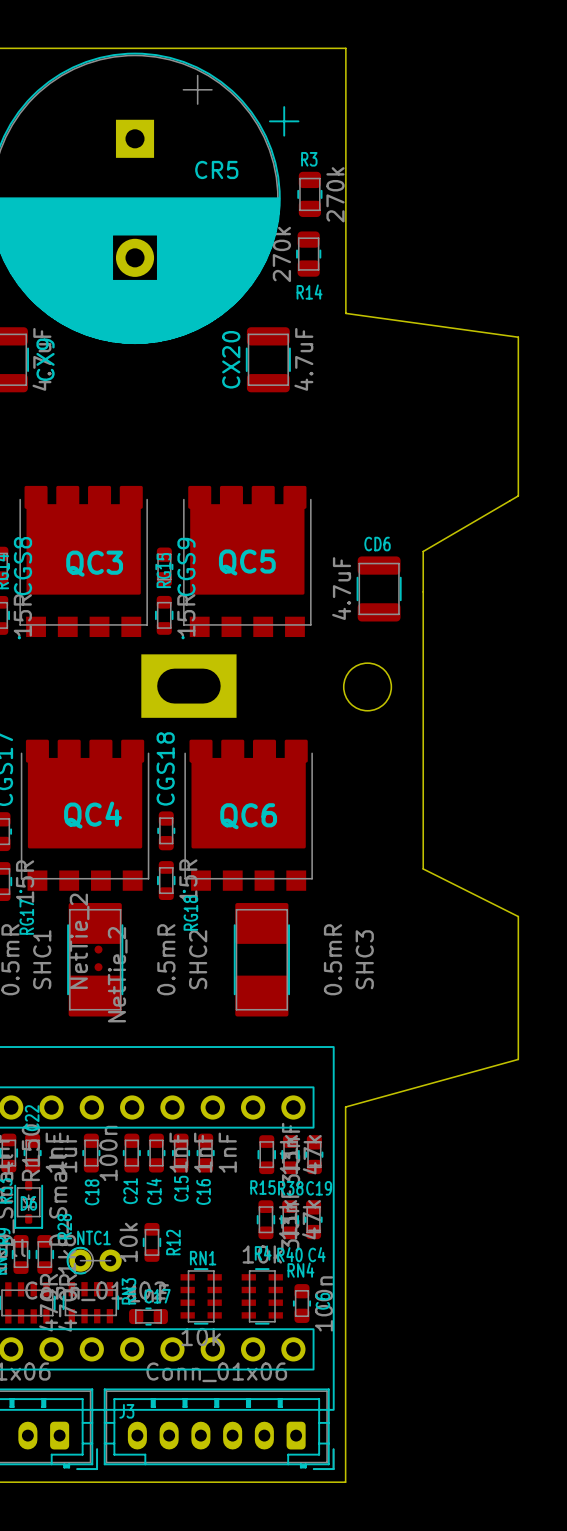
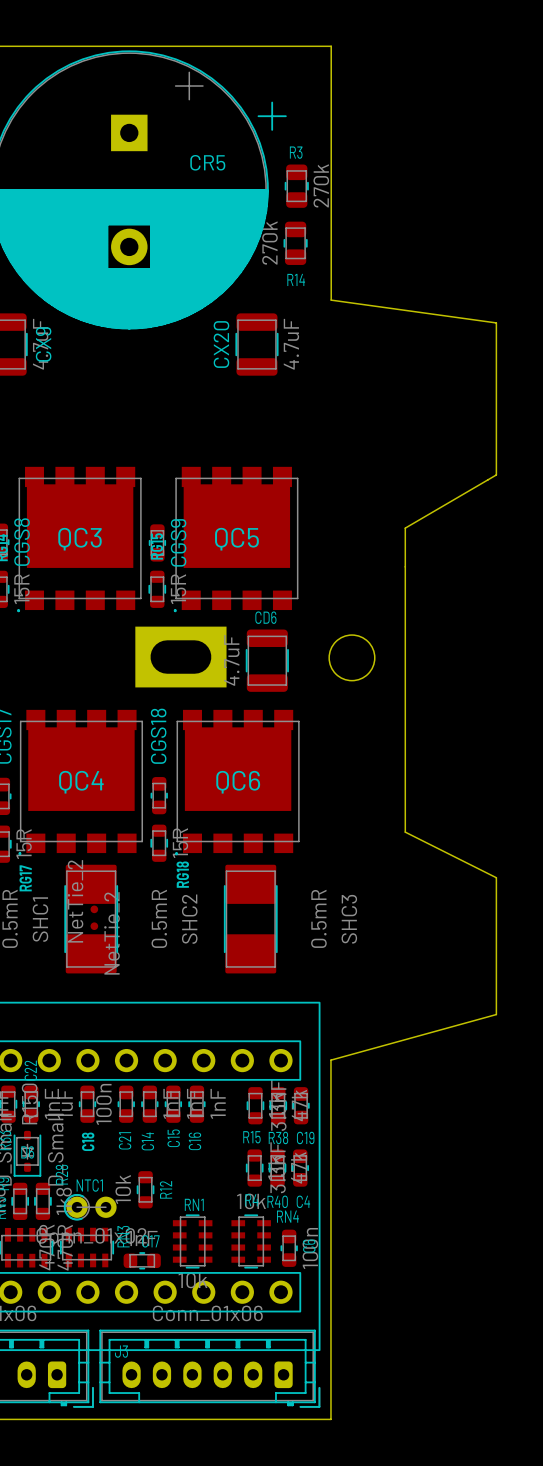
QC3 footprint: [17, 485, 148, 640] -> [17, 466, 142, 613]
QC5 footprint: [181, 485, 312, 640] -> [173, 466, 299, 613]
CD6 position: (379, 588) -> (267, 660)
QC4 footprint: [19, 739, 150, 894] -> [18, 709, 144, 856]
QC6 footprint: [182, 739, 313, 894] -> [175, 709, 300, 856]

